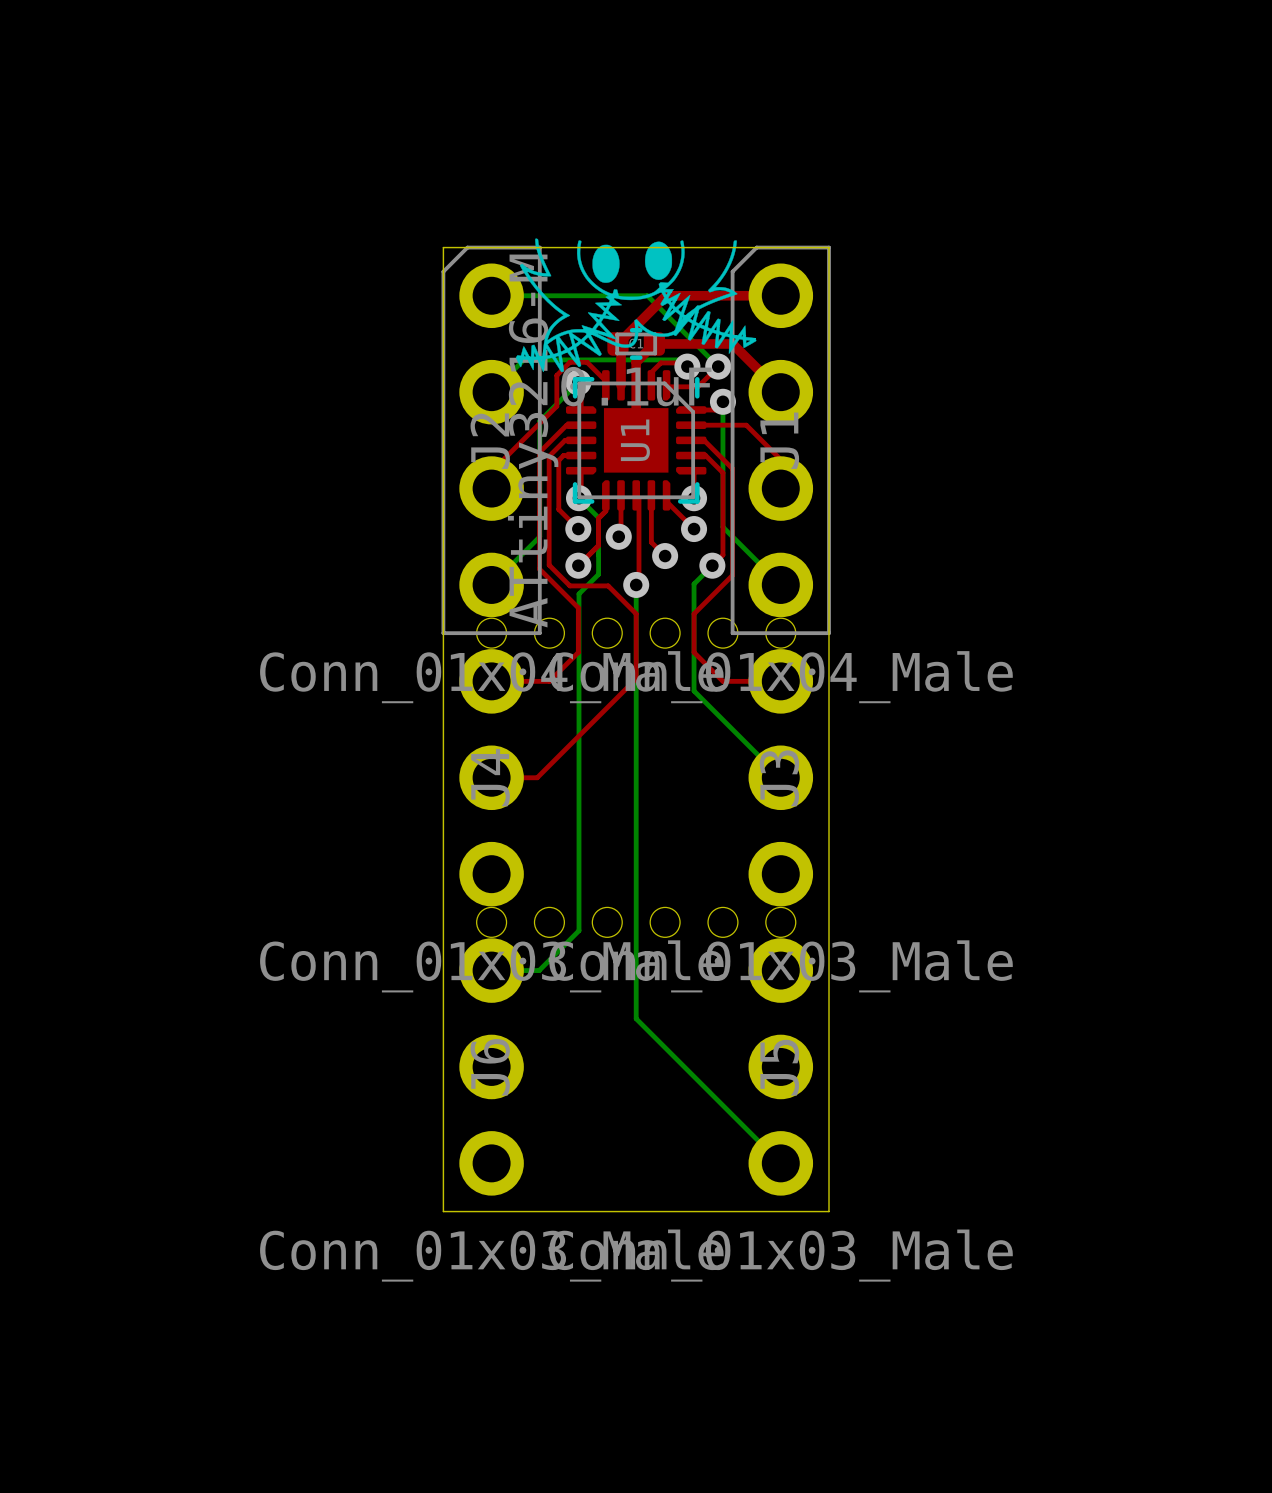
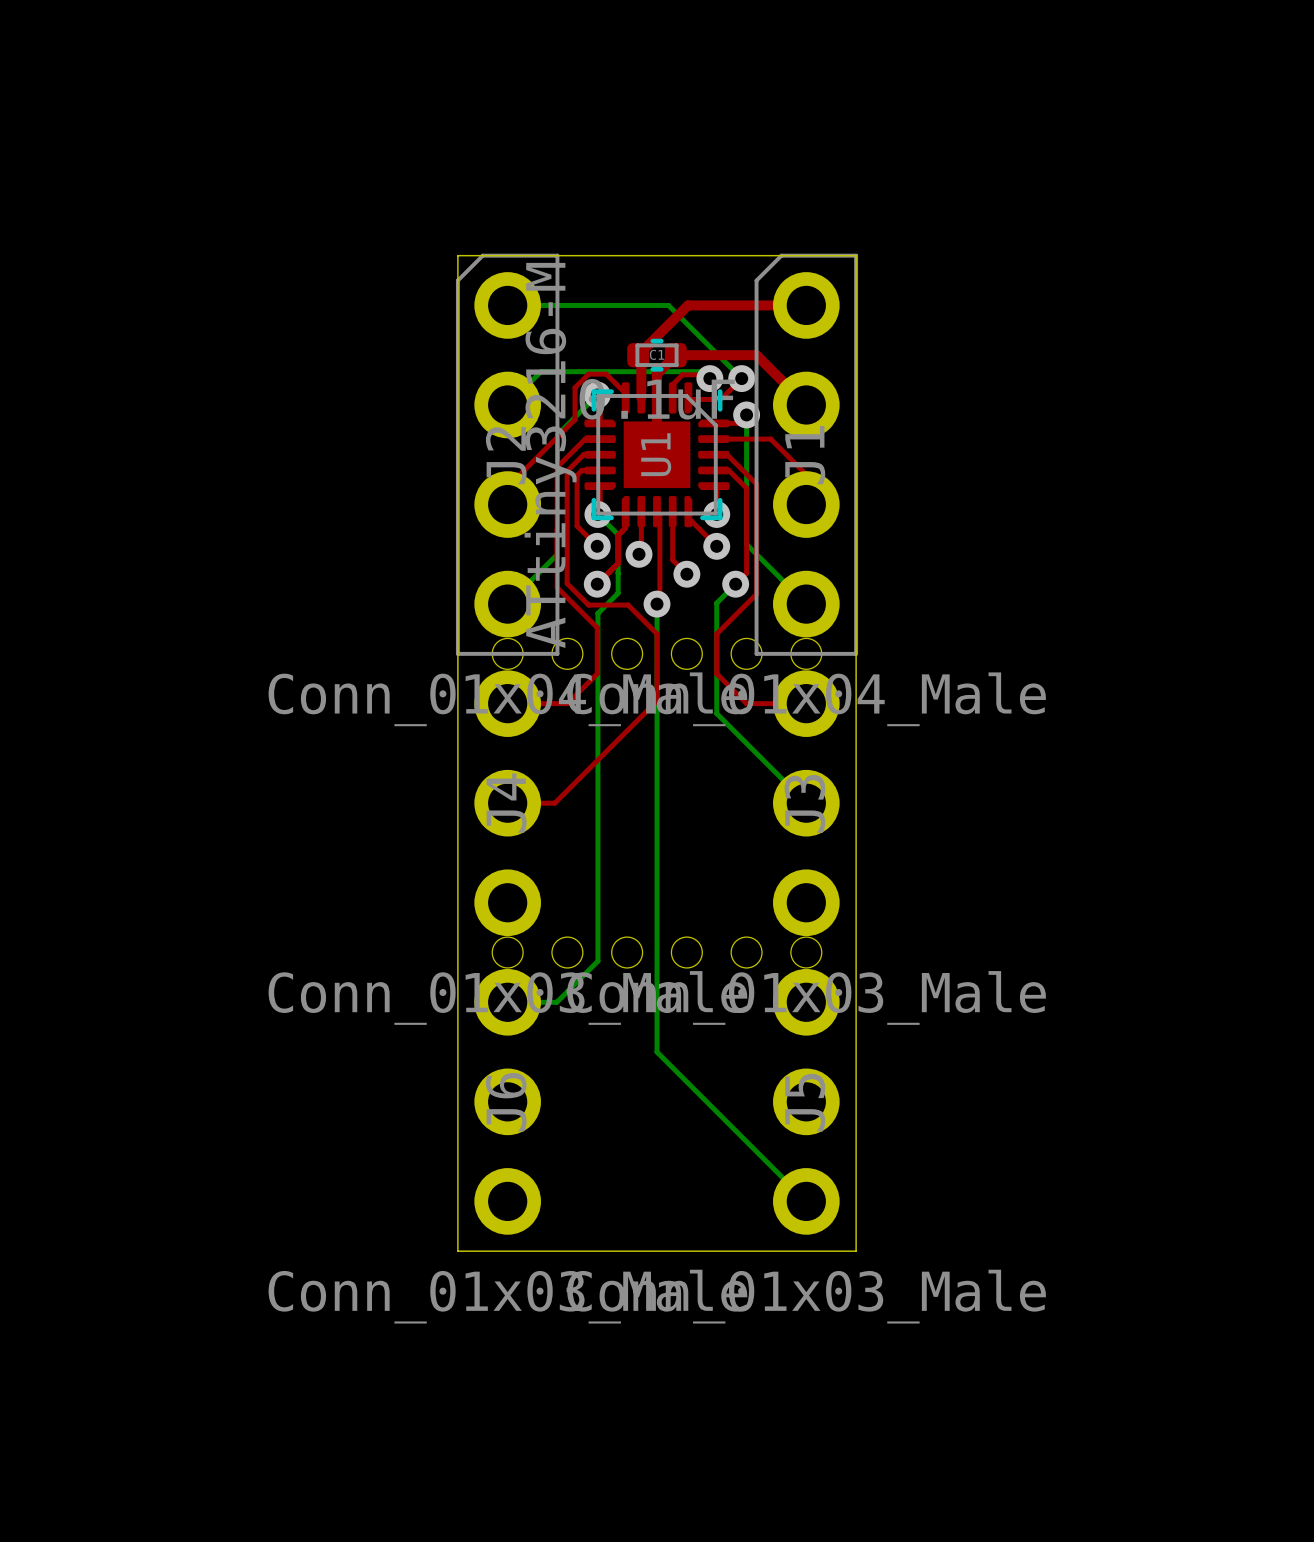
drawing: [515, 238, 757, 373] -> none

